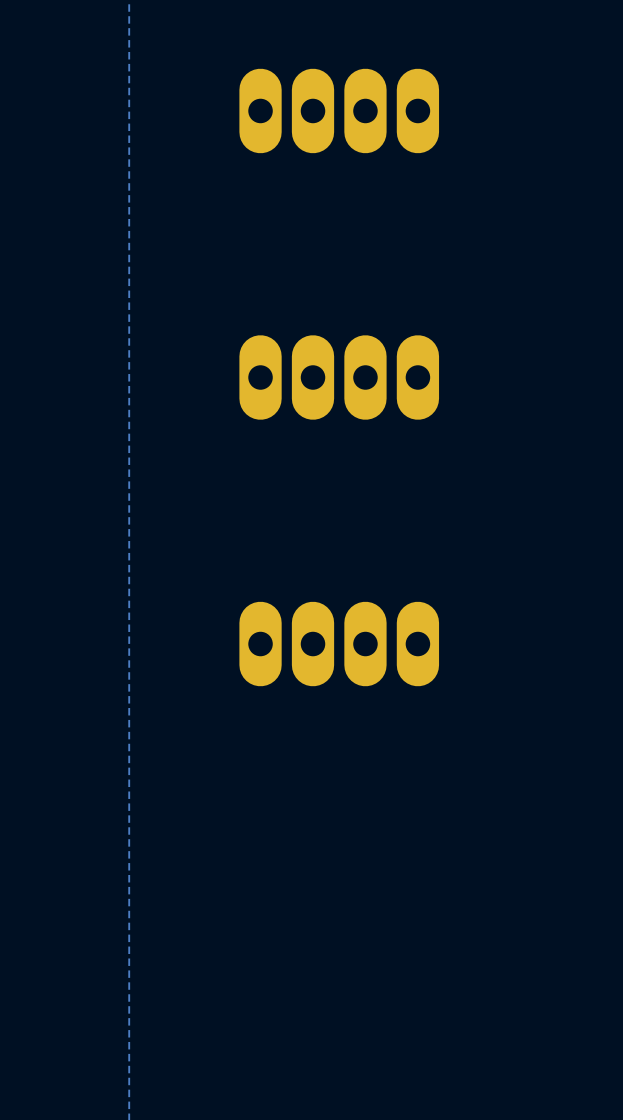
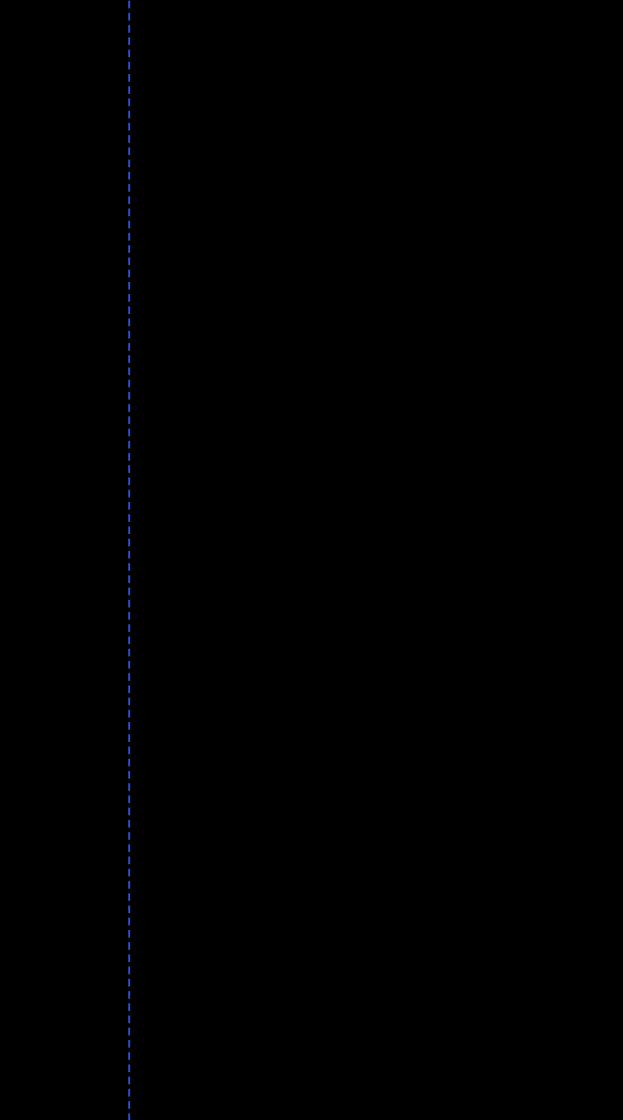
part: (339, 110) -> none
part: (339, 377) -> none
part: (339, 644) -> none

